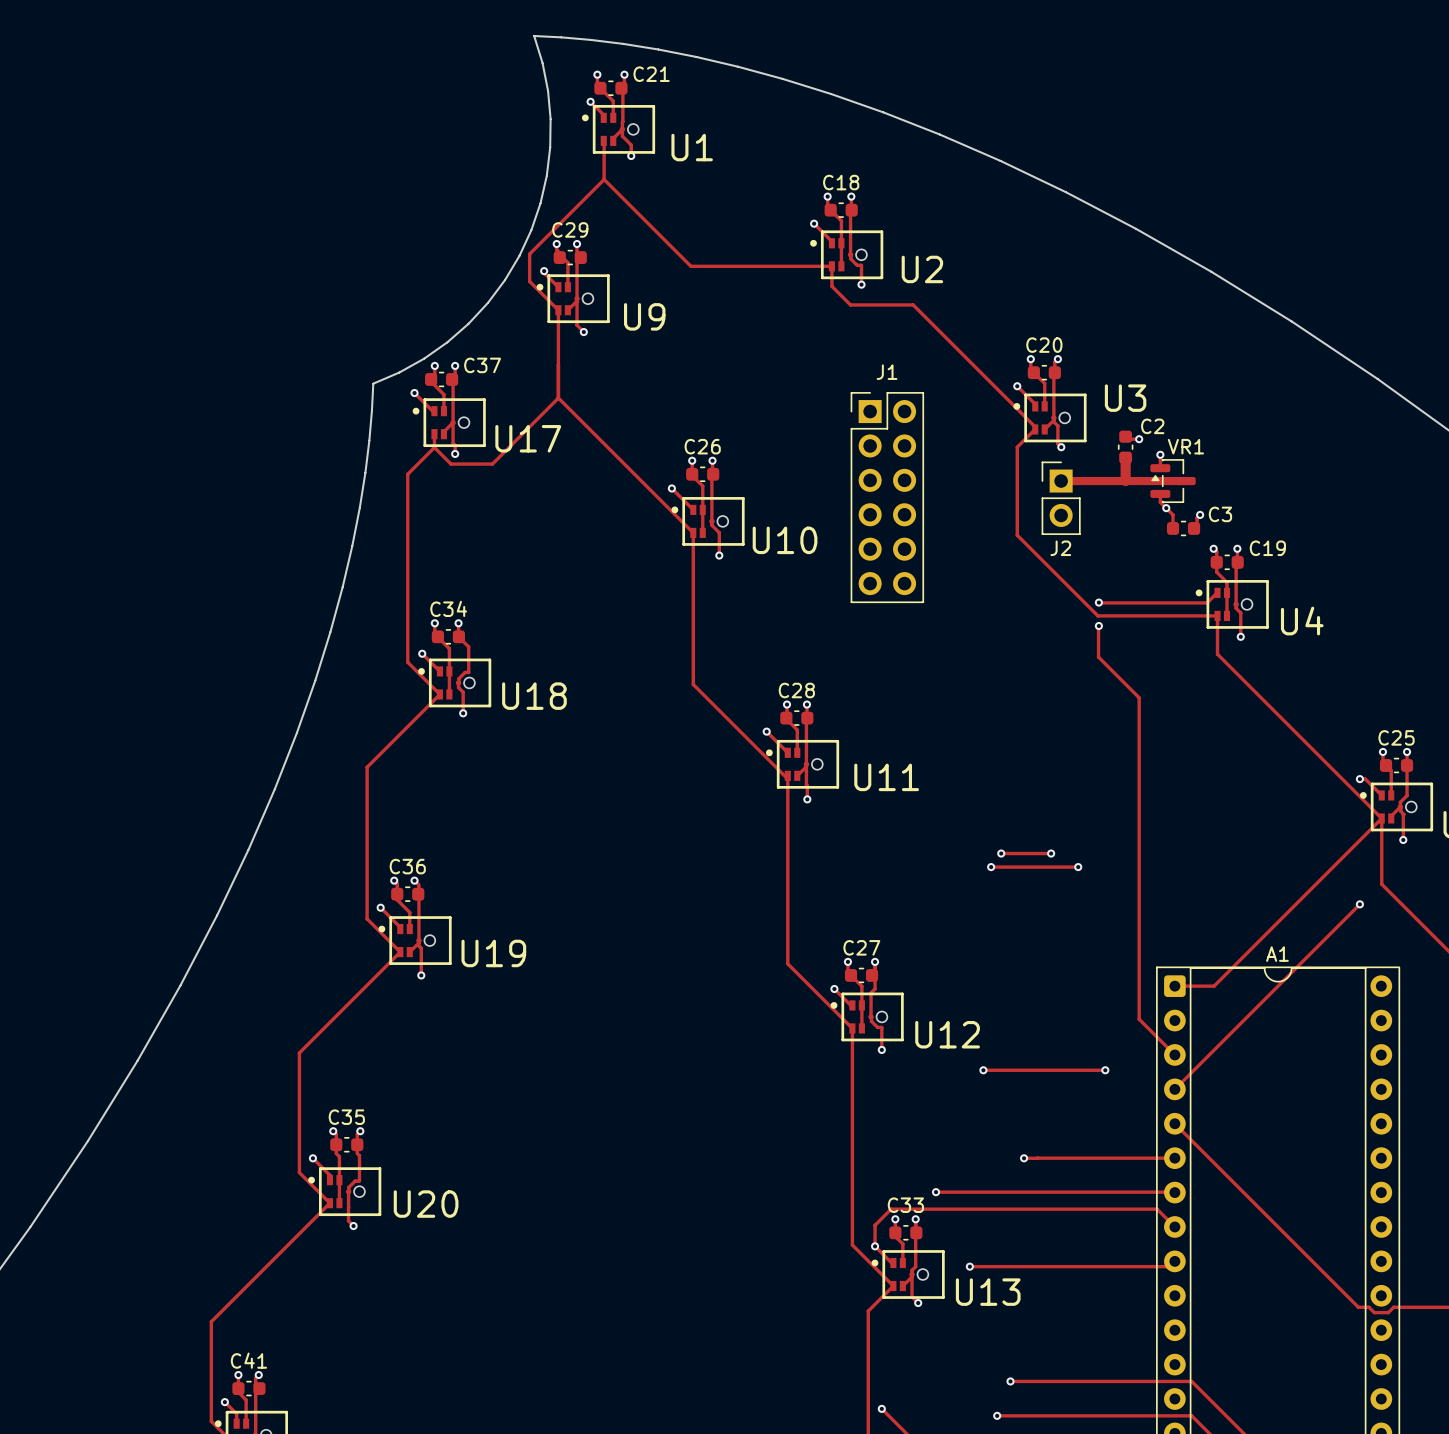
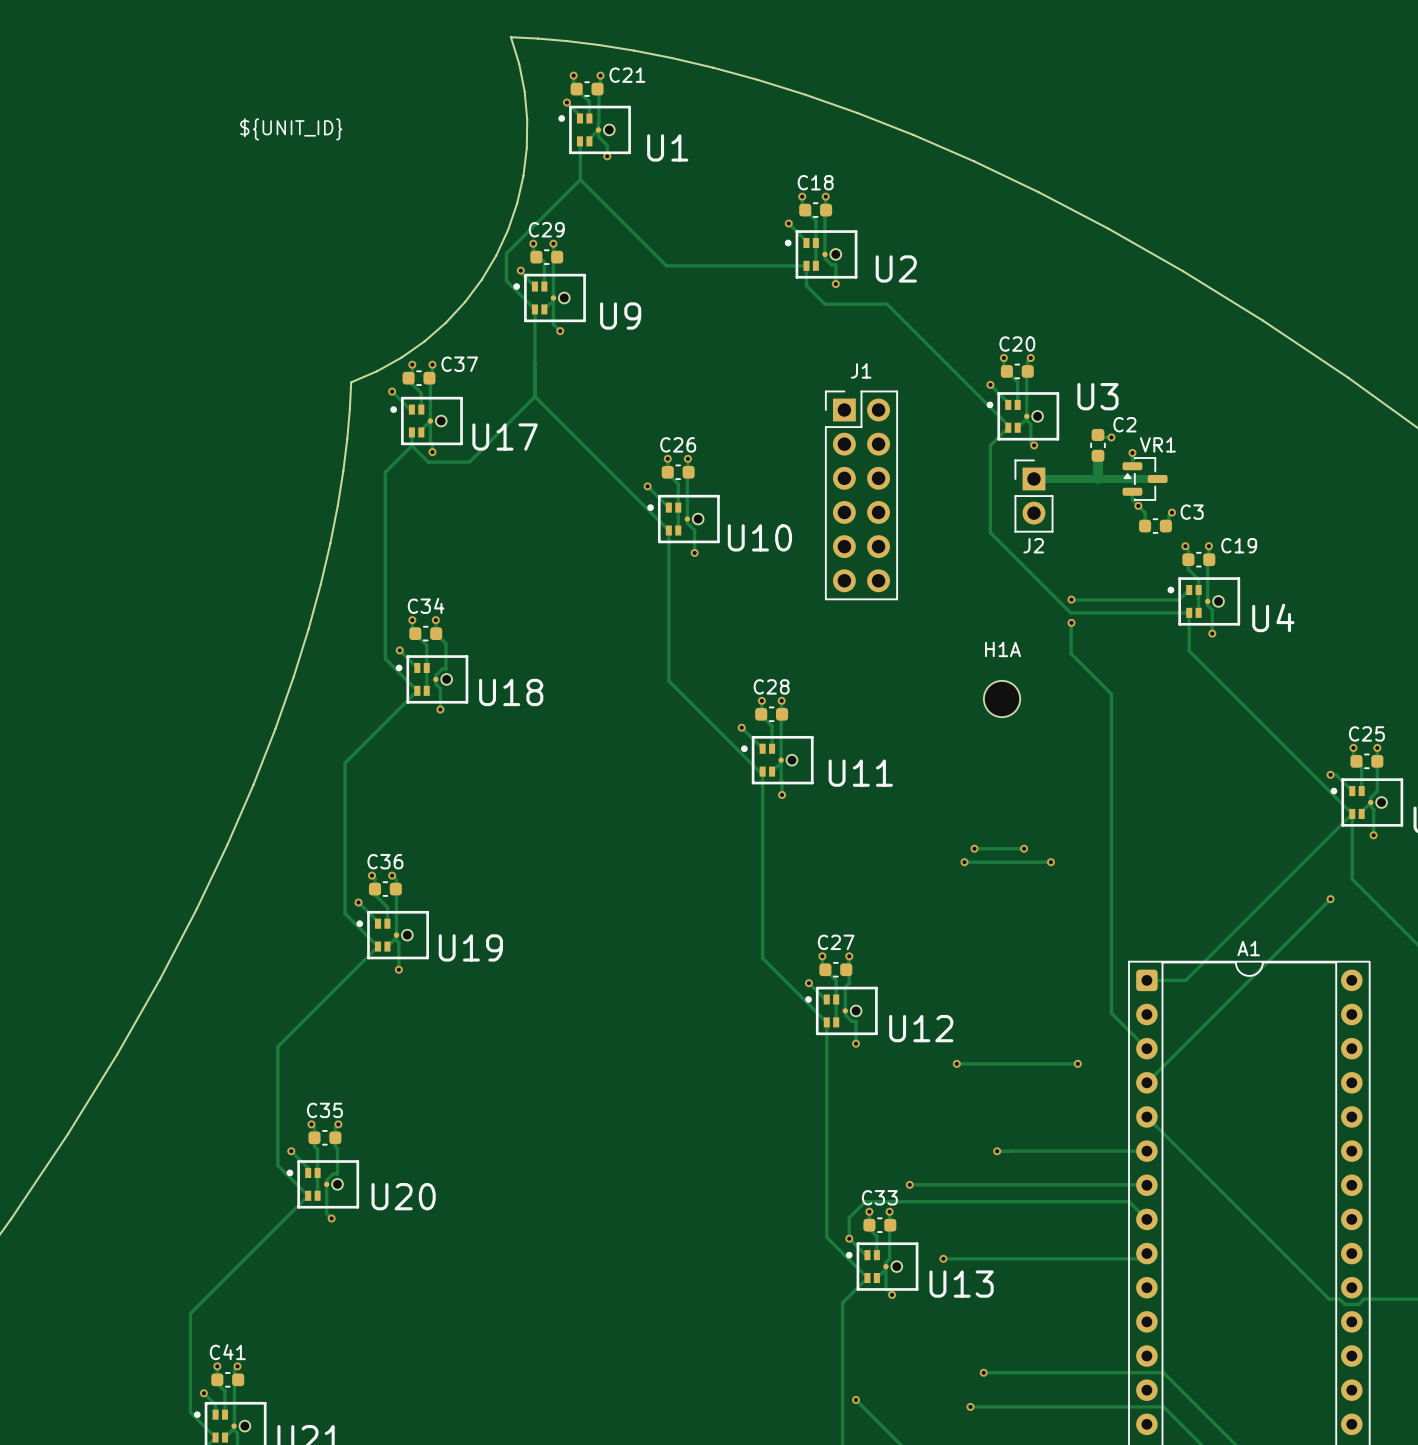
text: none -> ${UNIT_ID} (291, 129)
H1A: none -> (1002, 699)

